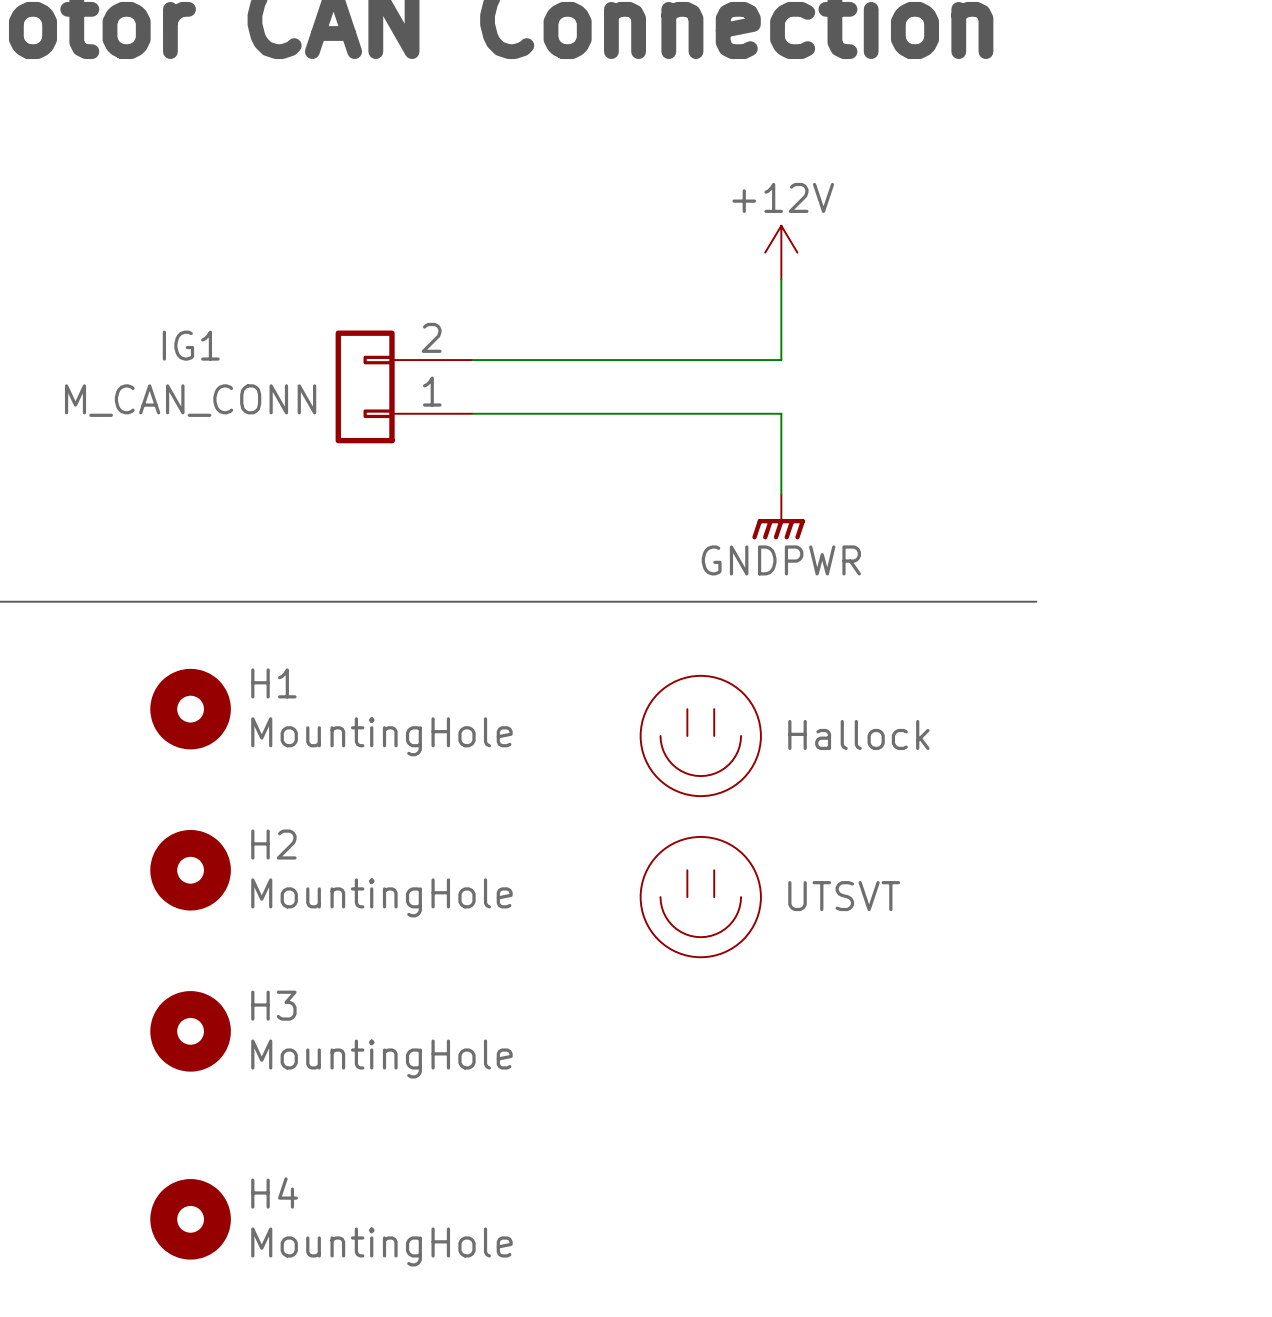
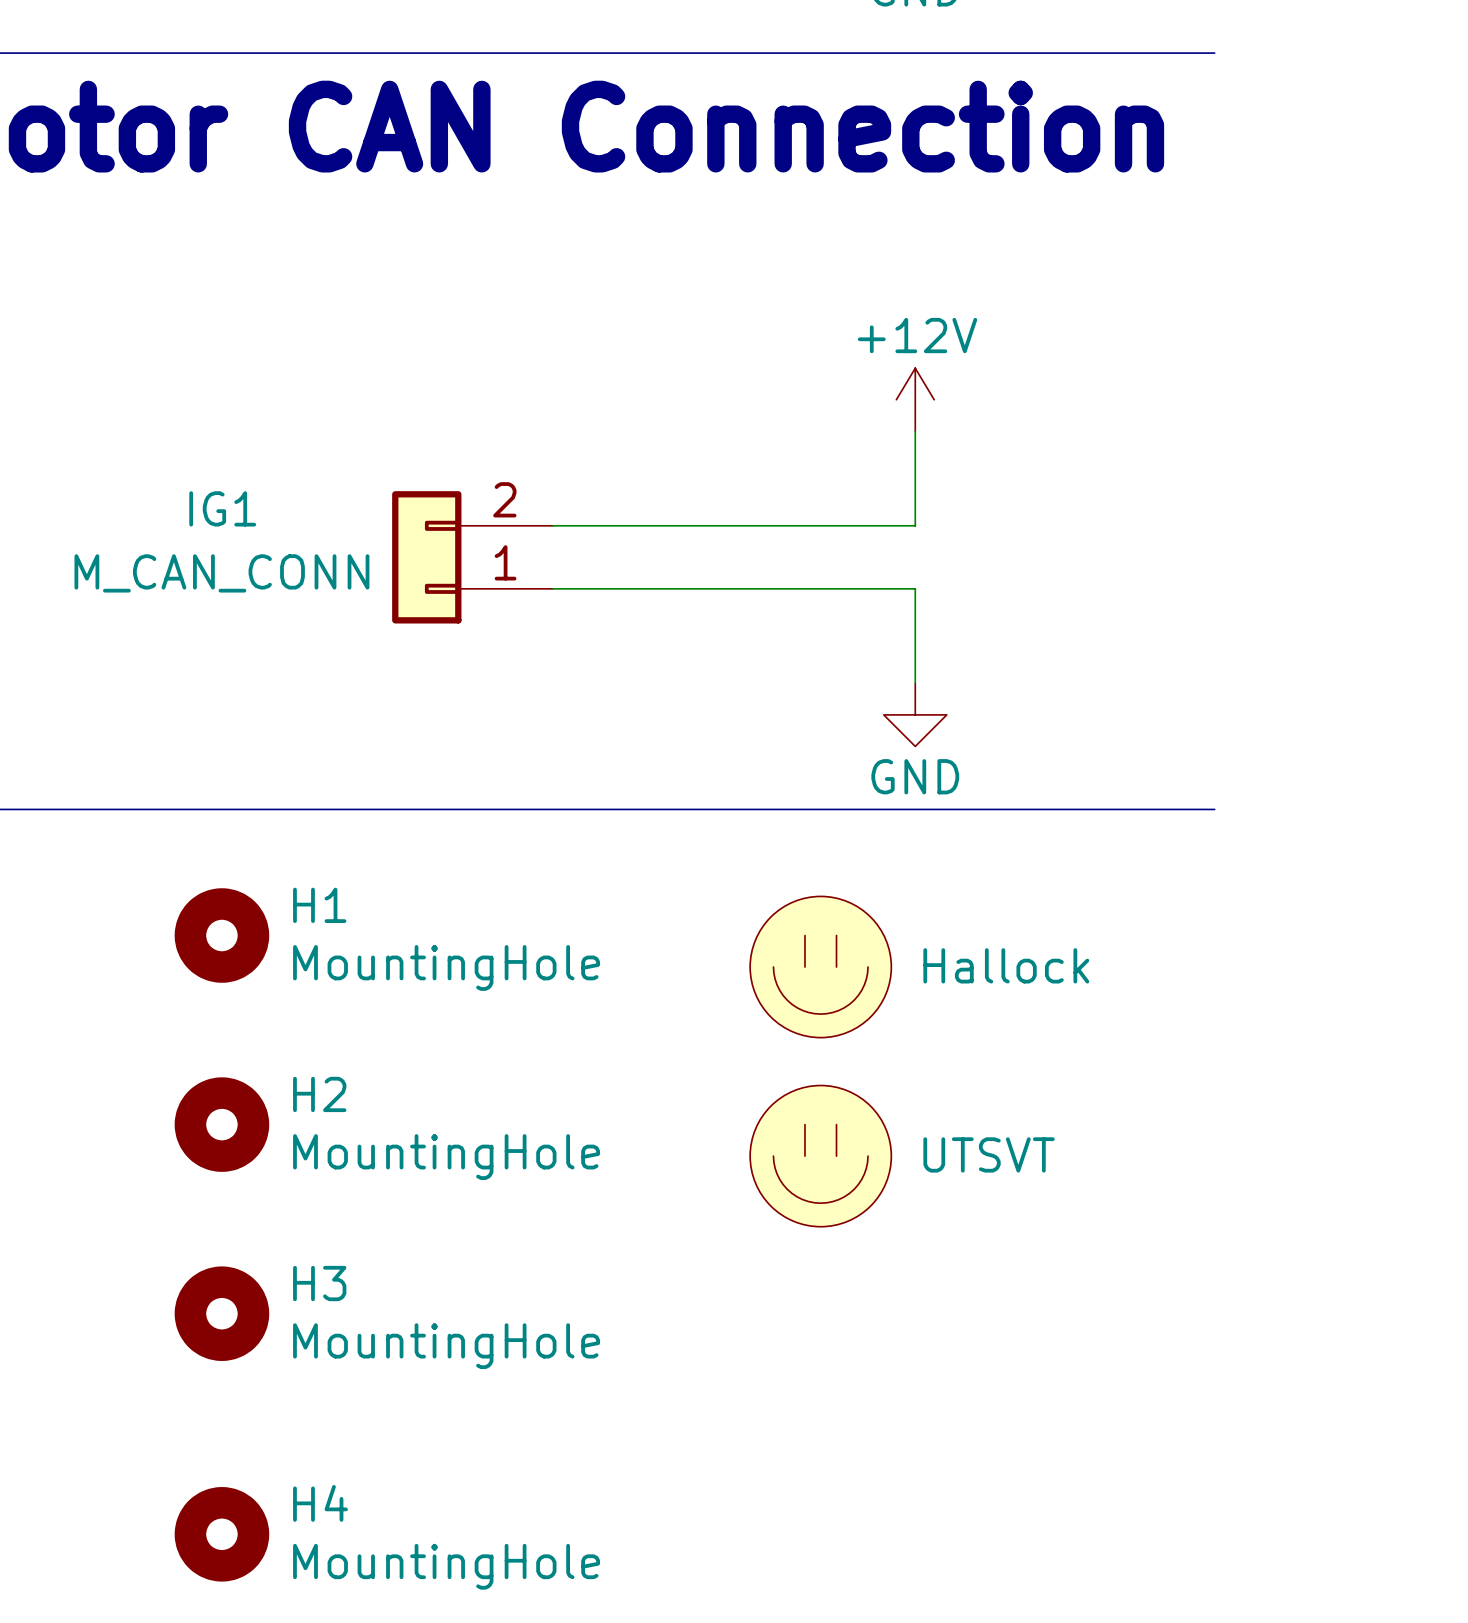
power symbol: GNDPWR (778, 516) -> GND (915, 714)

